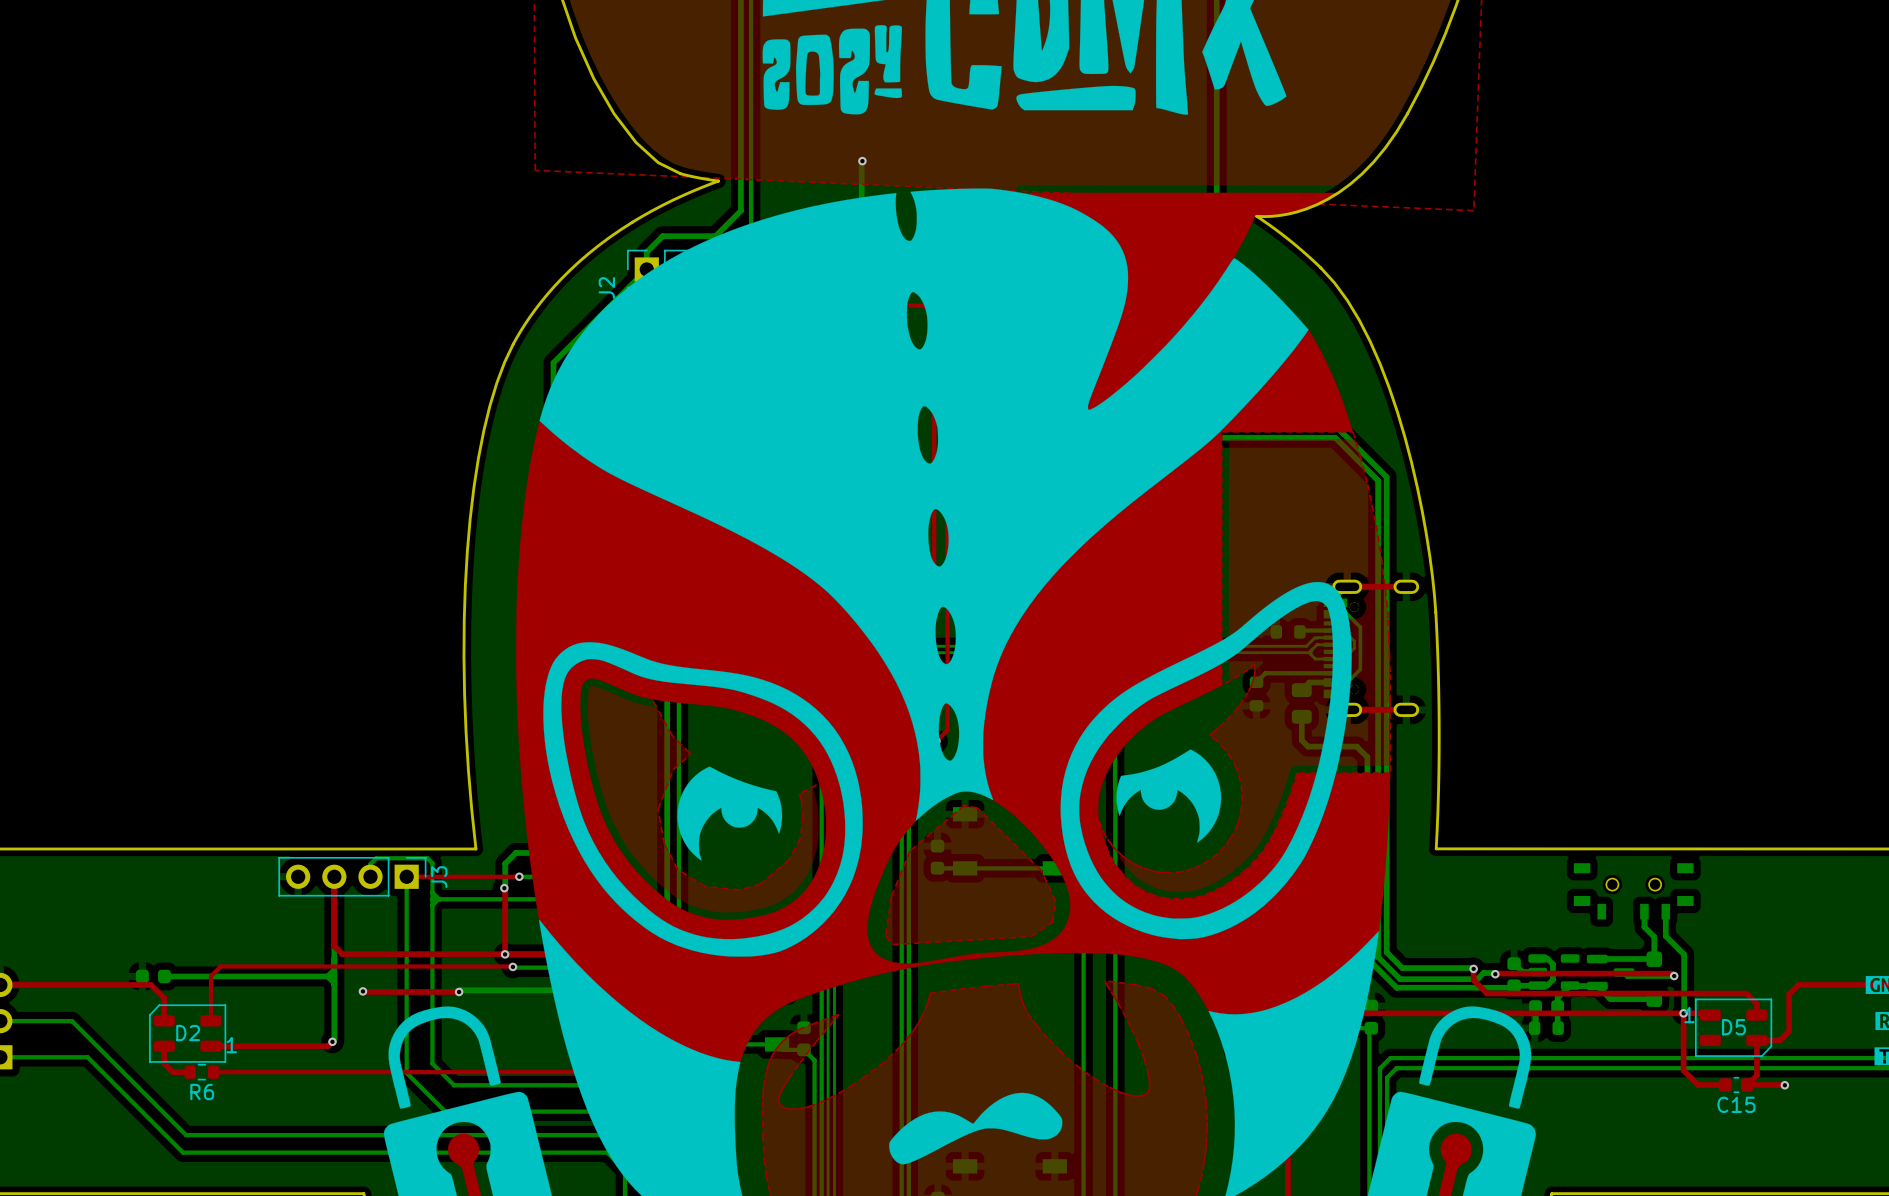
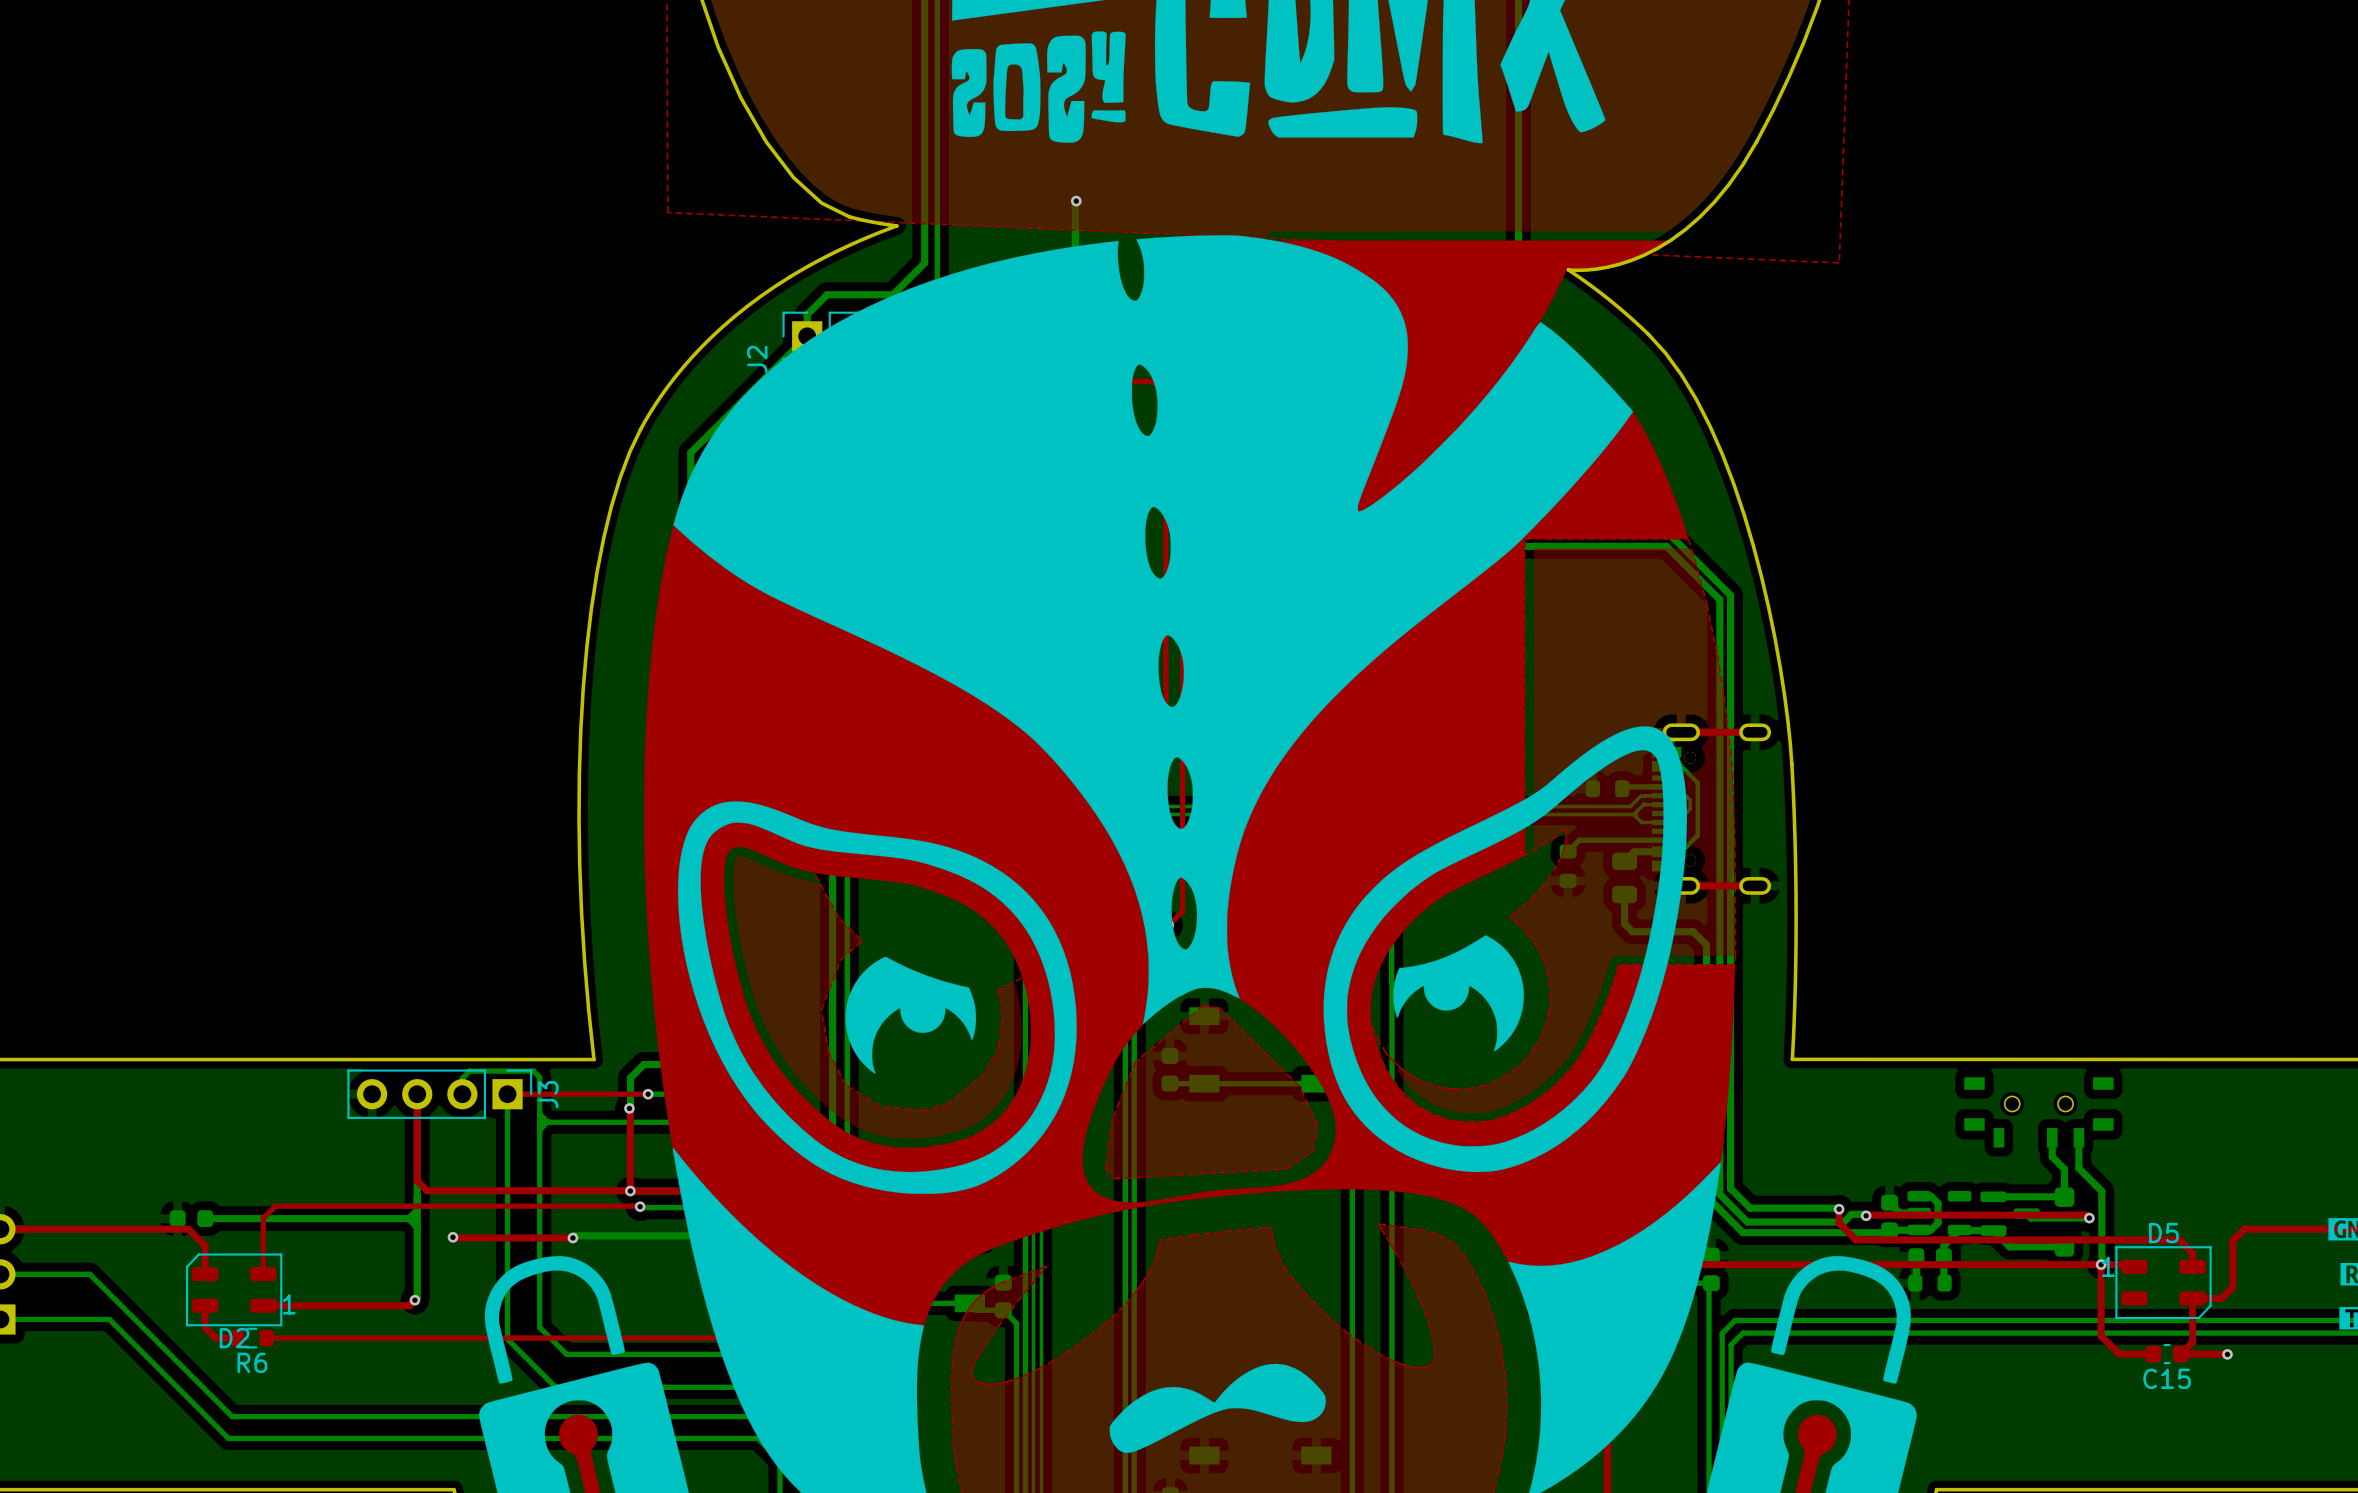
D5 name position: D5 (1733, 1027) -> D5 (2163, 1233)
D2 name position: D2 (188, 1033) -> D2 (234, 1338)

